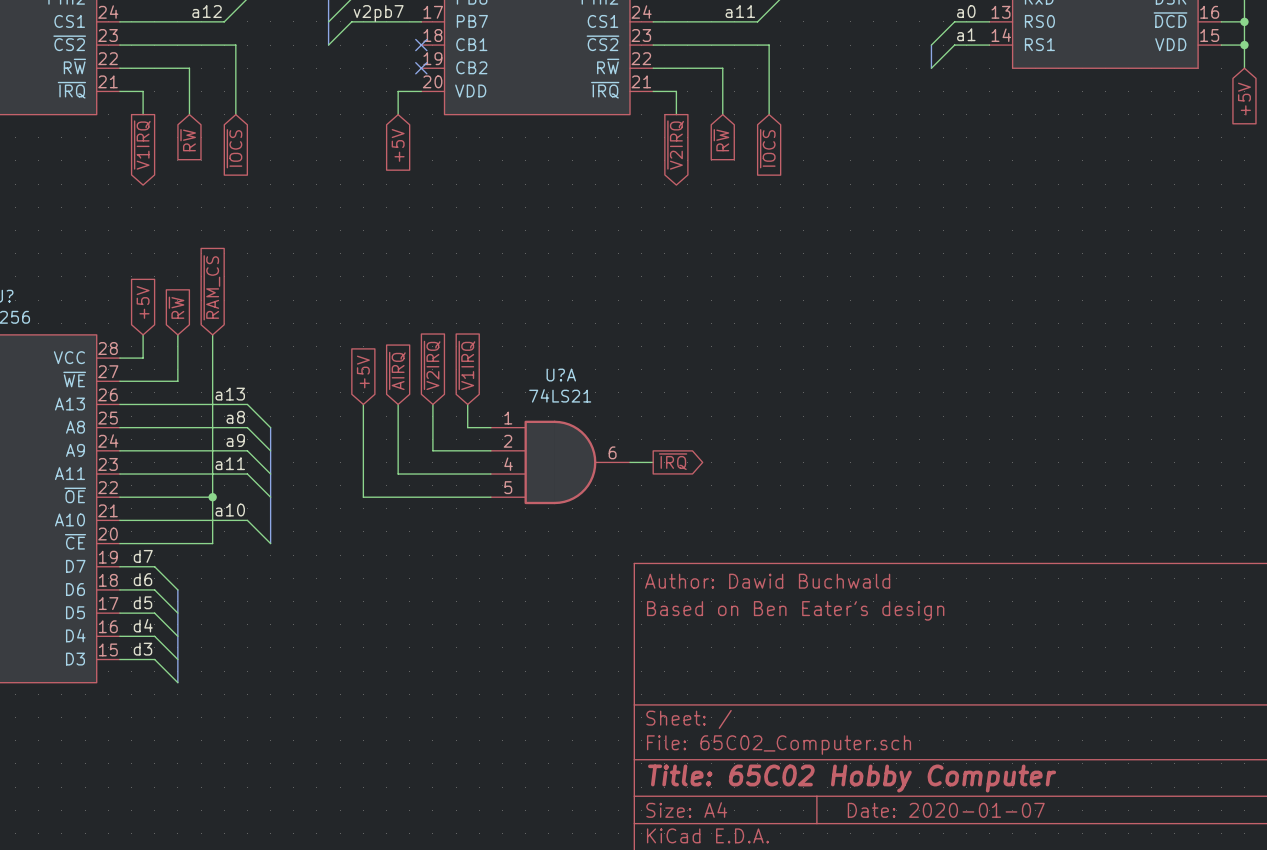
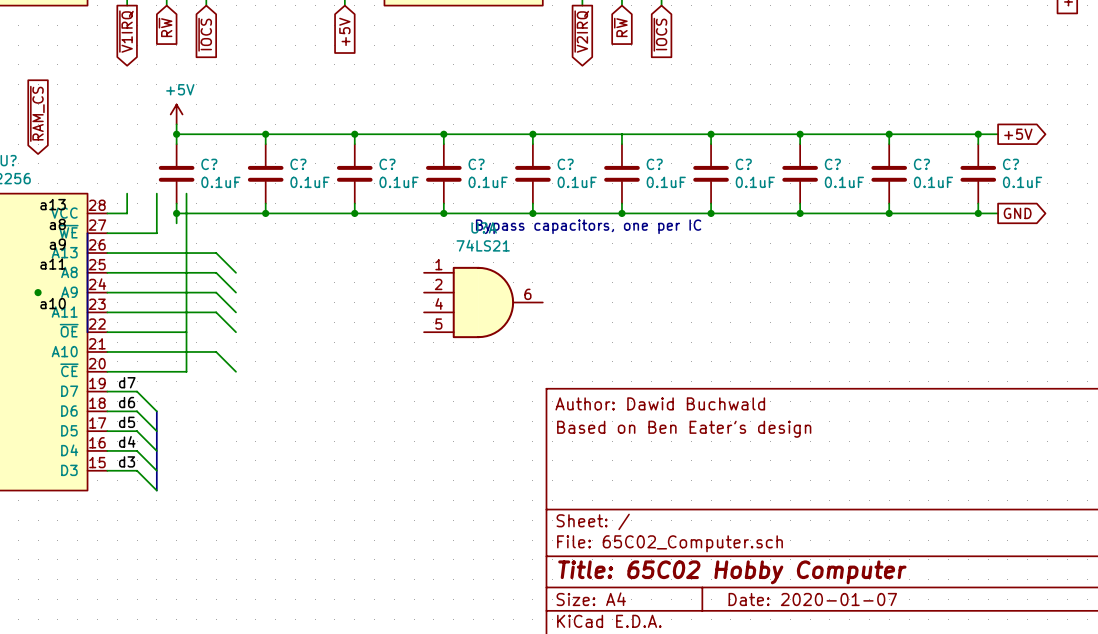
power symbol: none -> +5V (176, 114)
wire: none -> (176, 134) (998, 134)
junction: none -> (176, 134)
wire: none -> (265, 134) (265, 144)
junction: none -> (265, 134)
wire: none -> (354, 134) (354, 144)
junction: none -> (354, 134)
wire: none -> (443, 134) (443, 144)
junction: none -> (443, 134)
wire: none -> (532, 134) (532, 144)
junction: none -> (532, 134)
wire: none -> (621, 134) (621, 144)
wire: none -> (711, 134) (711, 144)
junction: none -> (711, 134)
wire: none -> (800, 134) (800, 144)
junction: none -> (800, 134)
wire: none -> (889, 134) (889, 144)
junction: none -> (889, 134)
wire: none -> (978, 134) (978, 144)
junction: none -> (978, 134)
global label: none -> +5V (1018, 134)
global label position: ~{RAM_CS} (211, 287) -> ~{RAM_CS} (37, 113)
global label: +5V (143, 302) -> none
global label: R~{W} (176, 307) -> none
C?: none -> 0.1uF (176, 173)
C?: none -> 0.1uF (265, 173)
C?: none -> 0.1uF (354, 173)
C?: none -> 0.1uF (443, 173)
C?: none -> 0.1uF (532, 173)
C?: none -> 0.1uF (621, 173)
C?: none -> 0.1uF (711, 173)
C?: none -> 0.1uF (800, 173)
C?: none -> 0.1uF (889, 173)
C?: none -> 0.1uF (978, 173)
wire: none -> (176, 203) (176, 223)
wire: none -> (265, 203) (265, 213)
wire: none -> (443, 203) (443, 213)
wire: none -> (532, 203) (532, 213)
wire: none -> (621, 203) (621, 213)
wire: none -> (711, 203) (711, 213)
wire: none -> (800, 203) (800, 213)
wire: none -> (889, 203) (889, 213)
wire: none -> (978, 203) (978, 213)
label: none -> a13 (53, 204)
wire: none -> (176, 213) (998, 213)
junction: none -> (176, 213)
junction: none -> (265, 213)
junction: none -> (354, 213)
junction: none -> (443, 213)
junction: none -> (532, 213)
junction: none -> (621, 213)
junction: none -> (711, 213)
junction: none -> (800, 213)
junction: none -> (889, 213)
junction: none -> (978, 213)
global label: none -> GND (1017, 213)
global label: ~{V2IRQ} (432, 365) -> none
global label: ~{V1IRQ} (466, 365) -> none
label: none -> a8 (57, 224)
global label: ~{AIRQ} (397, 370) -> none
global label: +5V (363, 372) -> none
text: none -> Bypass capacitors, one per IC (588, 226)
label: none -> a9 (57, 244)
label: a13 (230, 394) -> none
wire: (363, 404) (363, 497) (490, 497) -> none
wire: (398, 404) (398, 474) (490, 474) -> none
wire: (432, 404) (432, 450) (490, 450) -> none
wire: (467, 404) (467, 427) (490, 427) -> none
label: none -> a11 (53, 263)
label: a8 (235, 417) -> none
bus: (270, 427) (270, 543) -> (87, 233) (87, 332)
label: a9 (235, 440) -> none
junction: none -> (38, 292)
global label: ~{IRQ} (673, 461) -> none
wire: (630, 462) (653, 462) -> none
label: none -> a10 (53, 303)
label: a11 (230, 463) -> none
junction: (212, 497) -> none
label: a10 (230, 510) -> none

